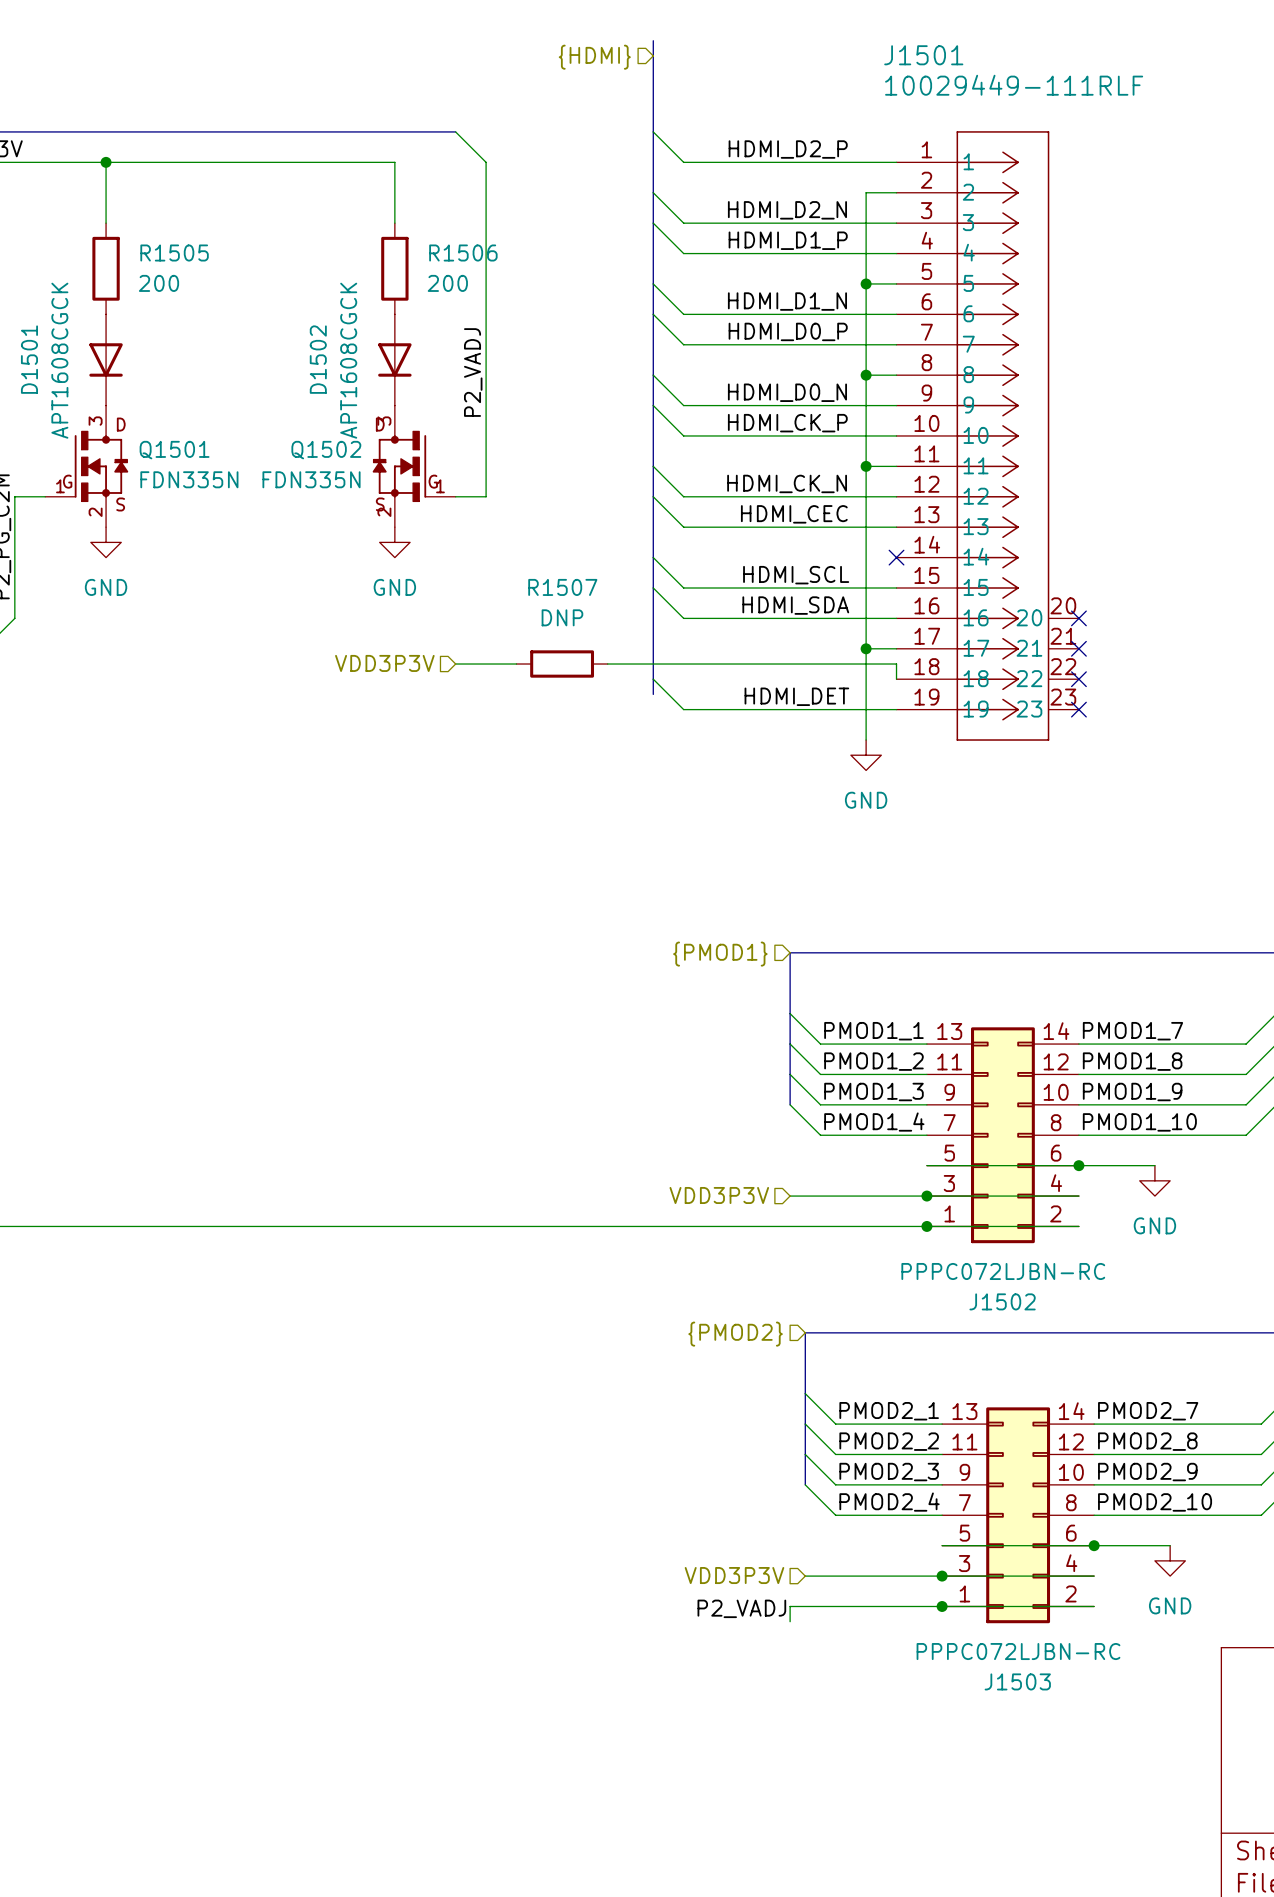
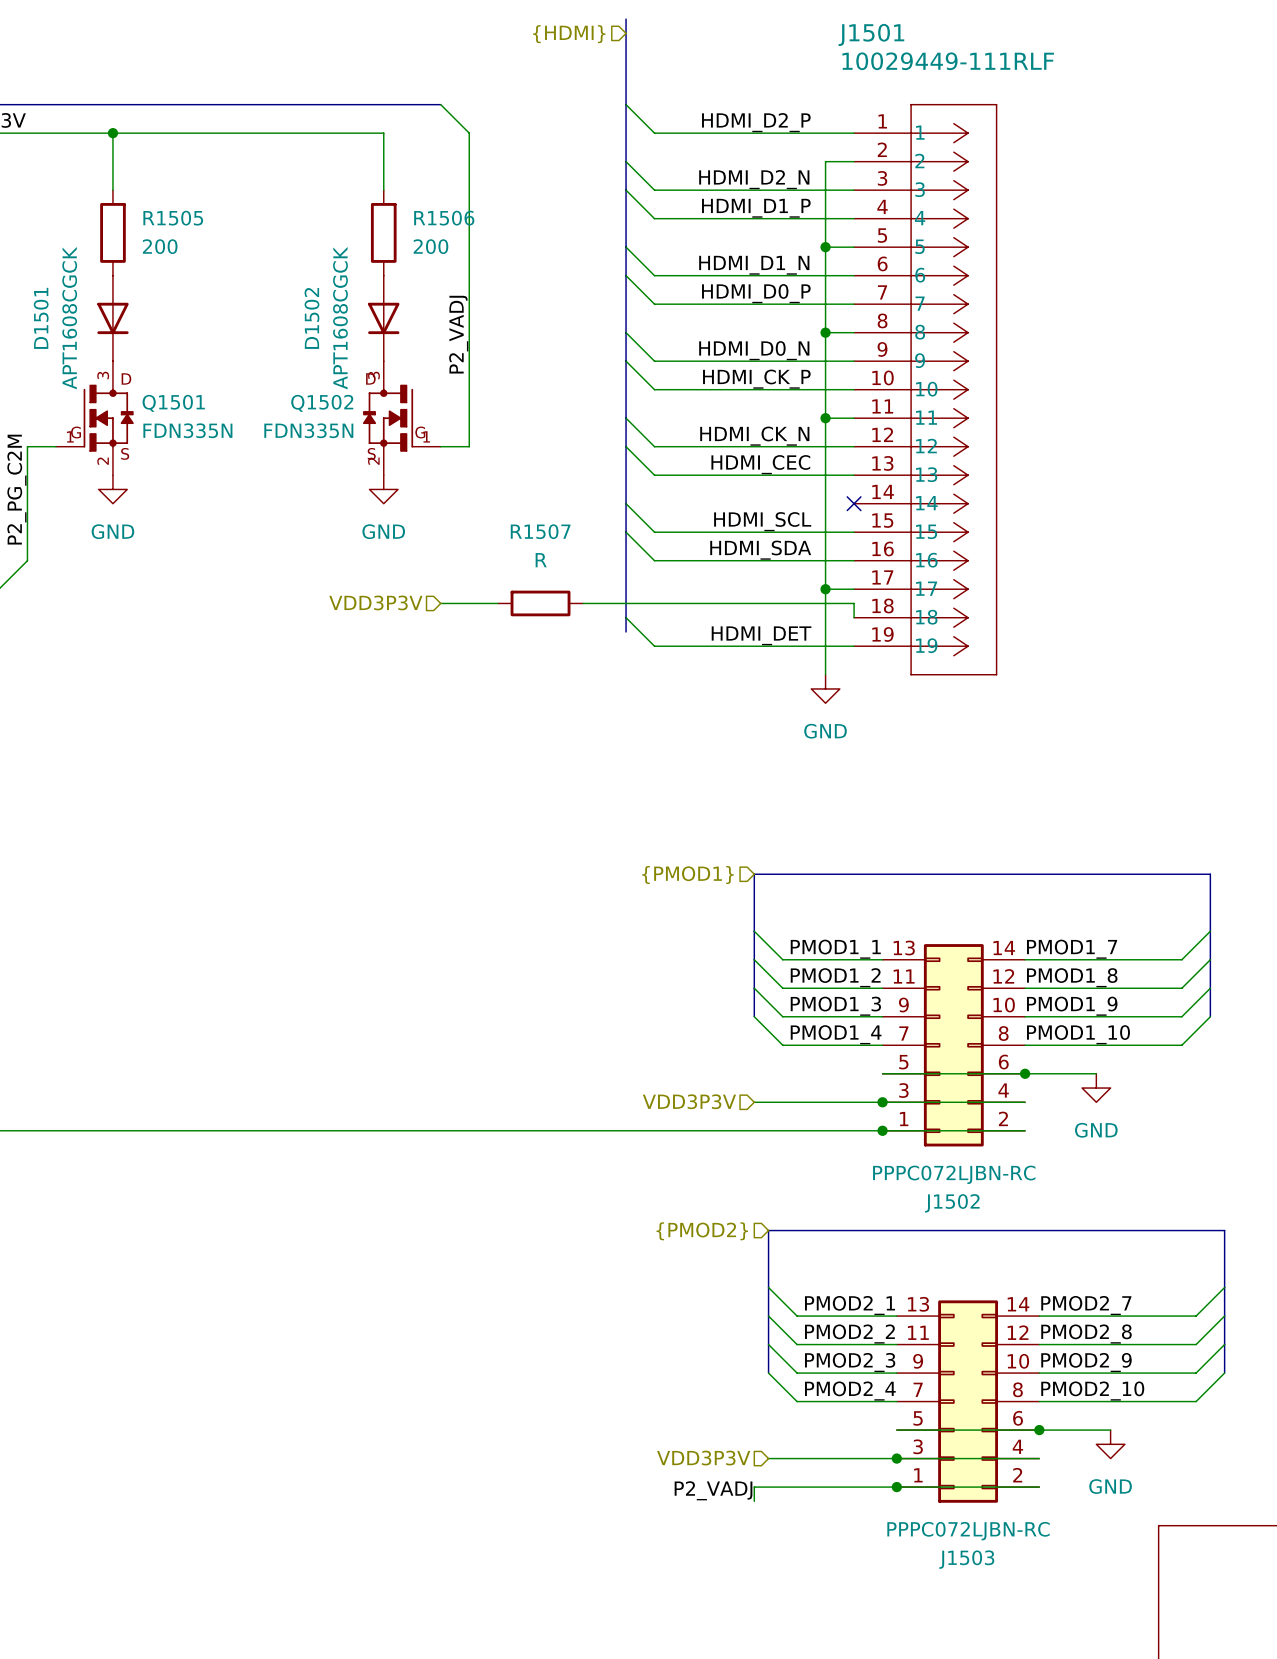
J1501 symbol: [896, 131, 1079, 741] -> [854, 103, 998, 676]
R1507 value: DNP (562, 617) -> R (541, 560)
no-connect mark: (1078, 618) -> none
no-connect mark: (1078, 648) -> none
no-connect mark: (1078, 679) -> none
no-connect mark: (1078, 709) -> none

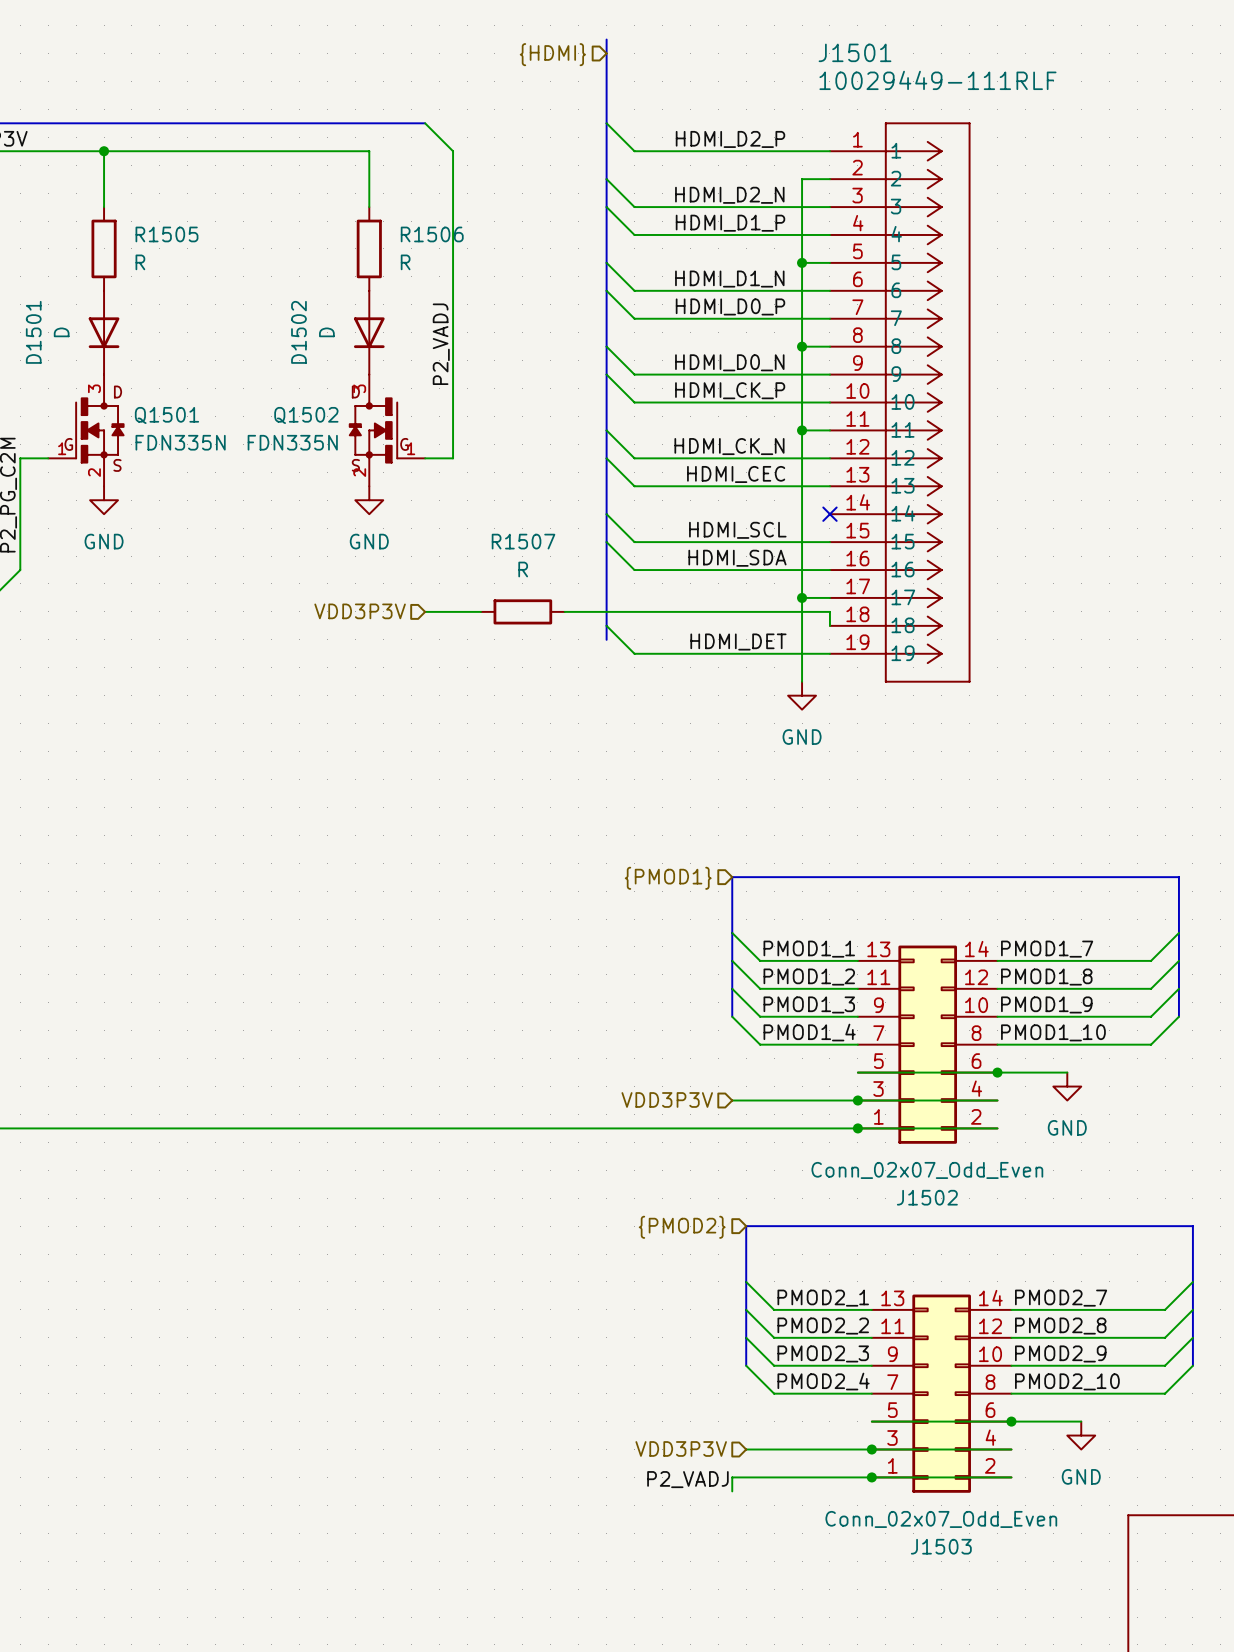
R1505 value: 200 (160, 246) -> R (140, 262)
R1506 value: 200 (430, 246) -> R (405, 262)
D1501 value: APT1608CGCK (69, 318) -> D (61, 332)
D1502 value: APT1608CGCK (340, 318) -> D (326, 332)
J1502 value: PPPC072LJBN-RC (954, 1174) -> Conn_02x07_Odd_Even (927, 1170)
J1503 value: PPPC072LJBN-RC (968, 1531) -> Conn_02x07_Odd_Even (941, 1519)

